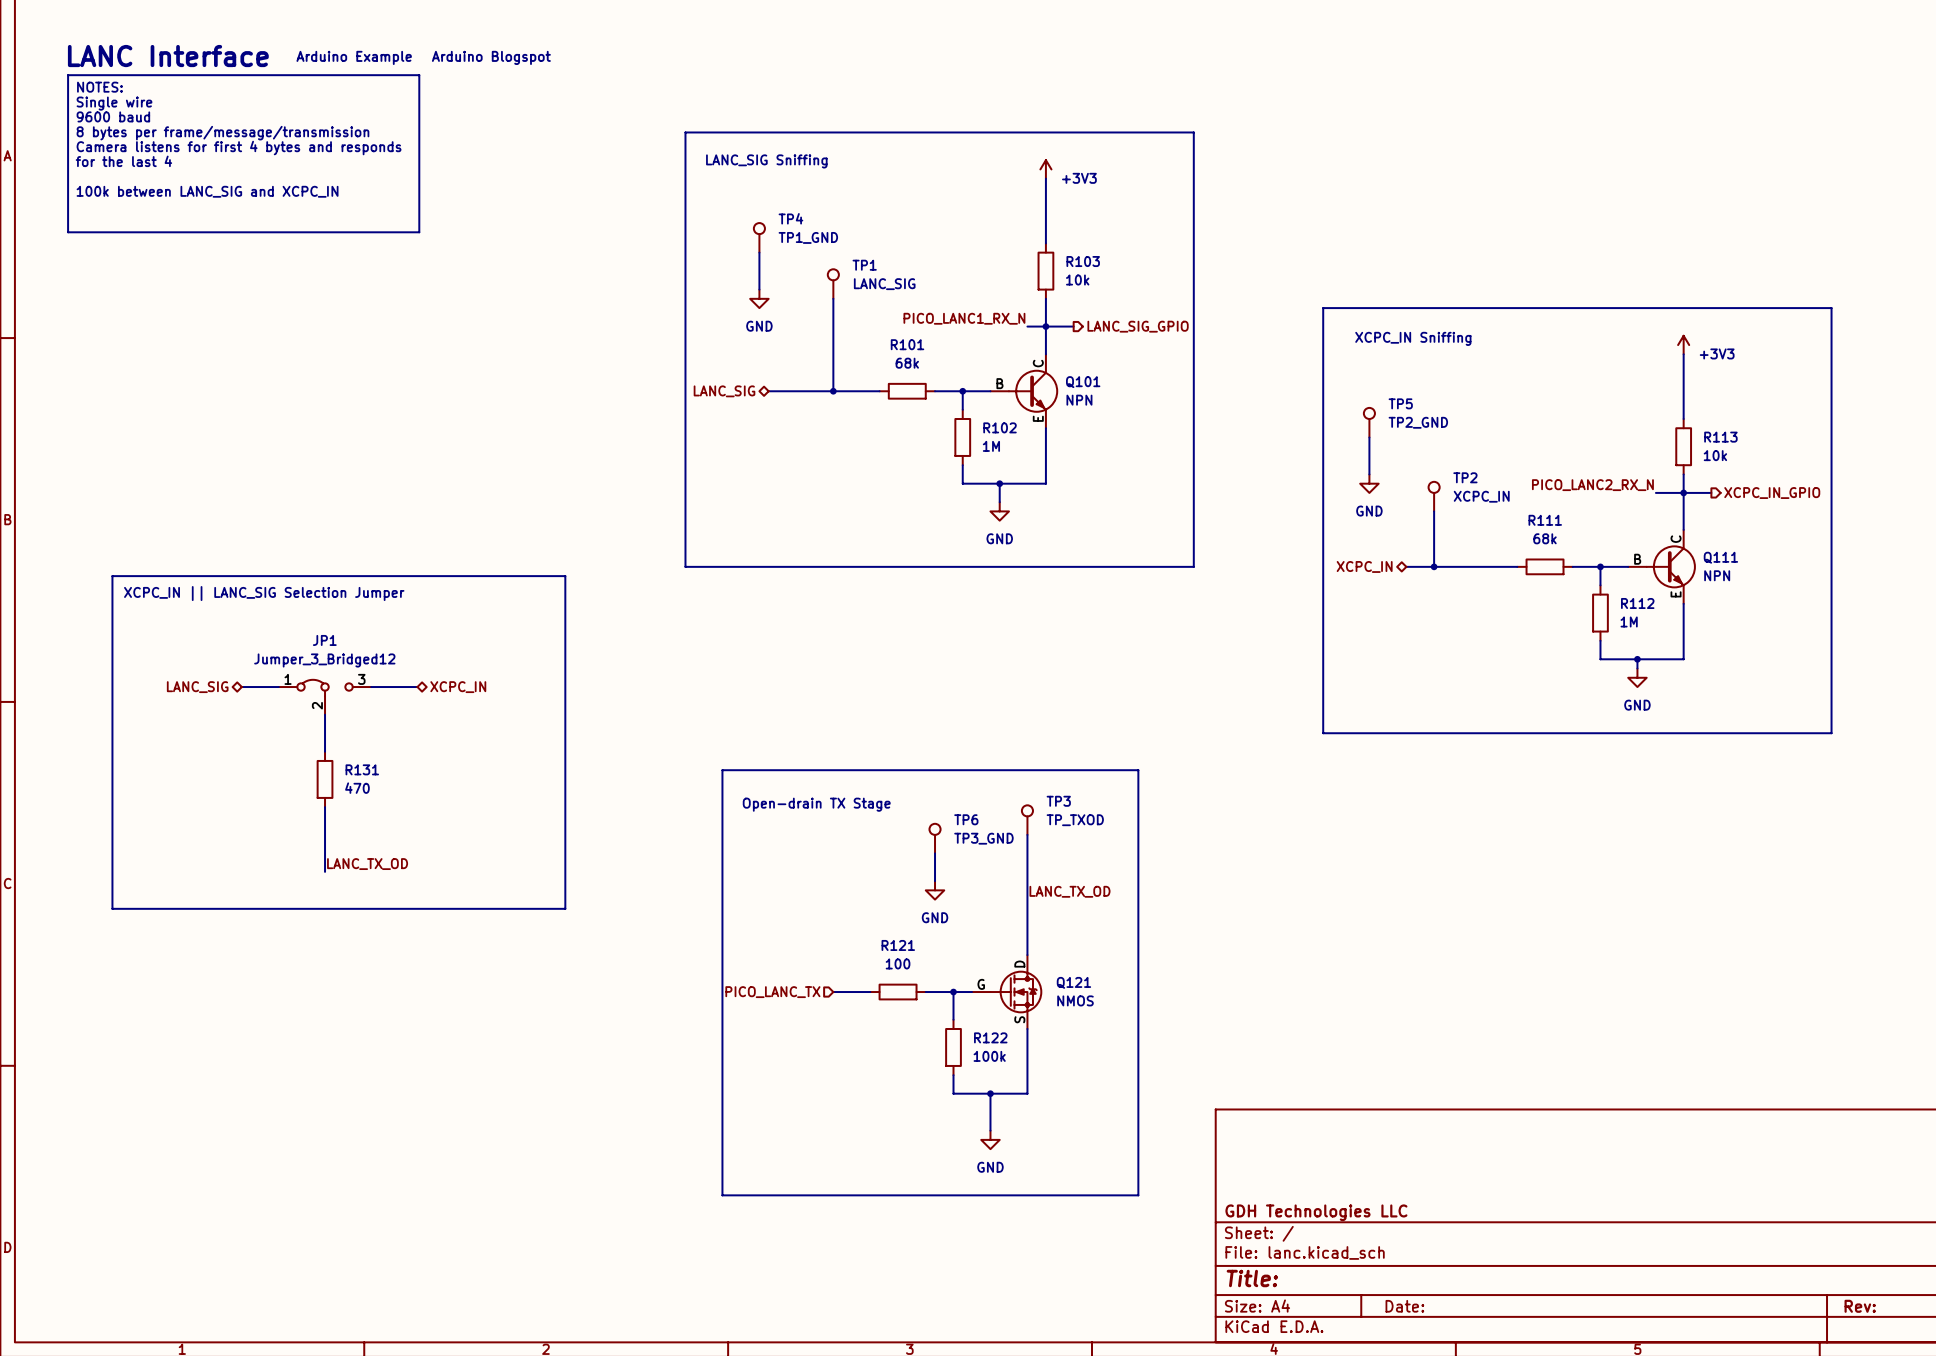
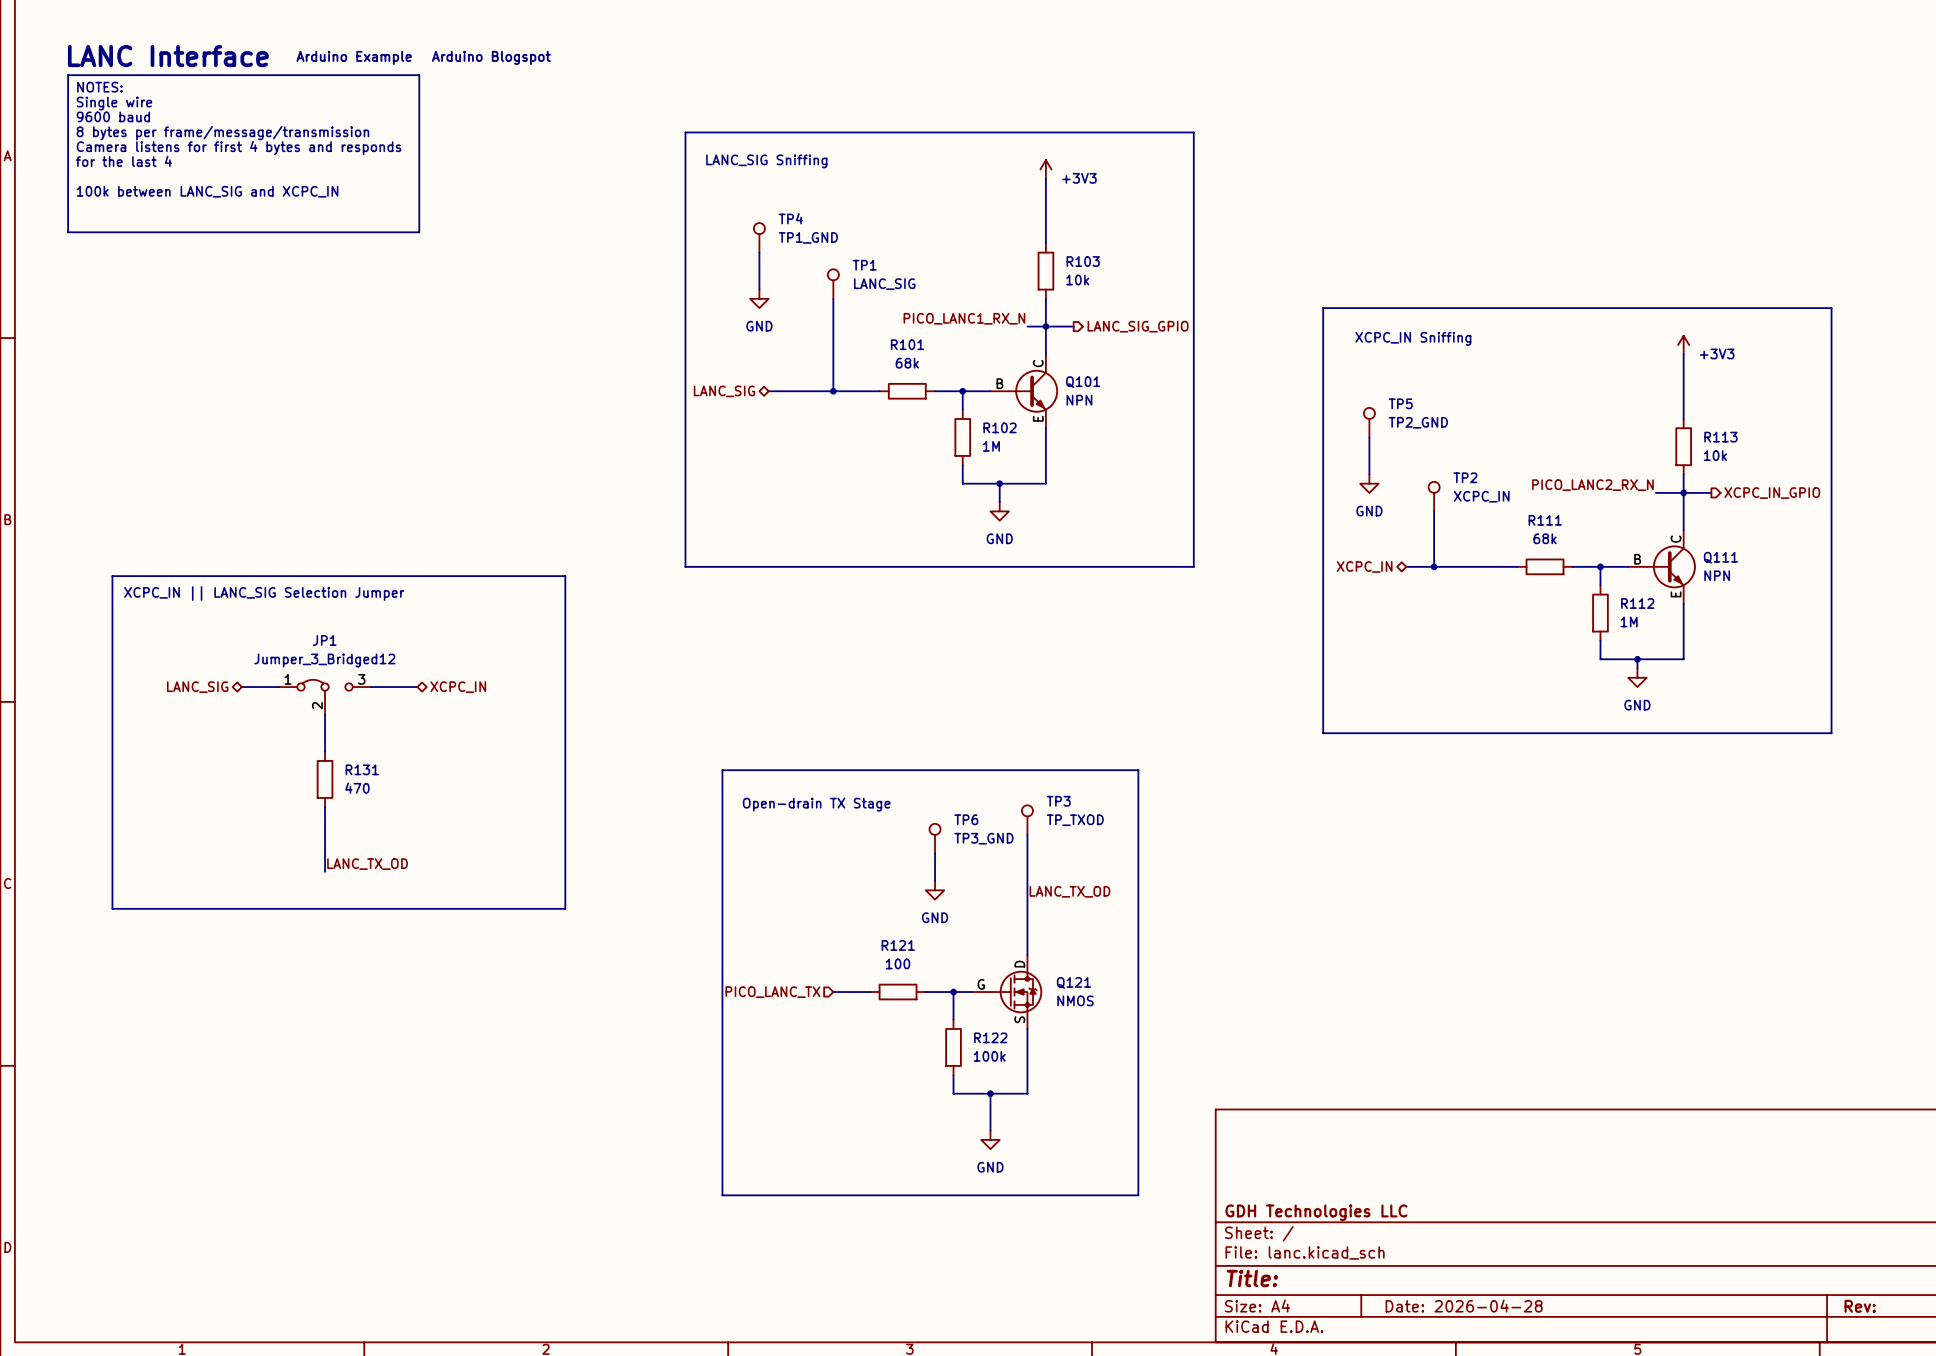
title block: Date: (1404, 1306) -> Date: 2026-04-28 (1464, 1306)

